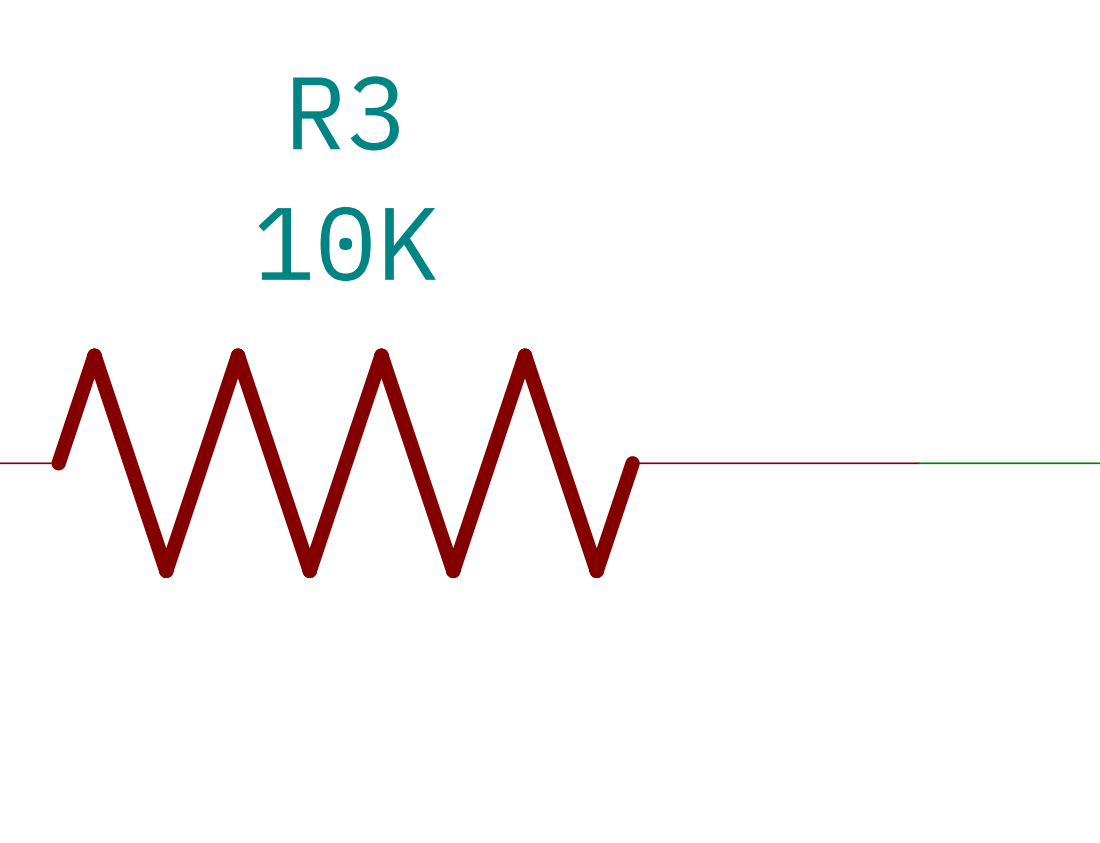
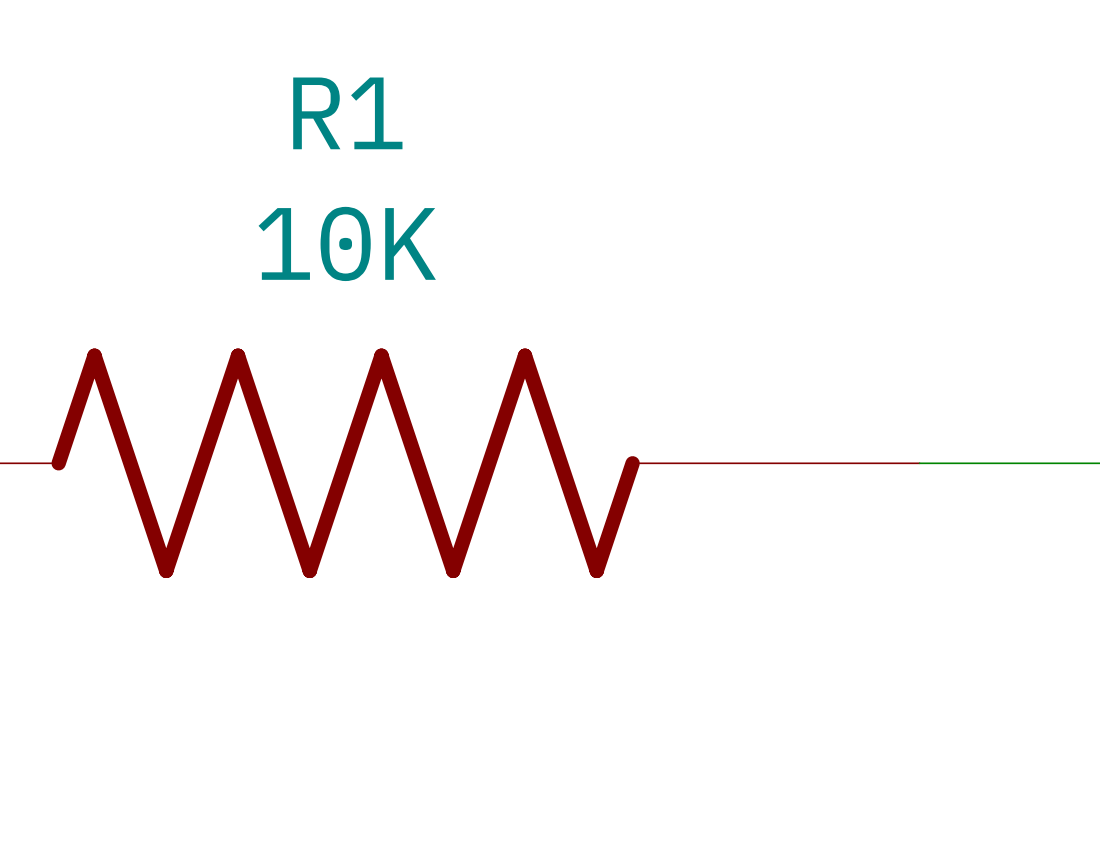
R3 name: R3 (346, 113) -> R1 (347, 113)

